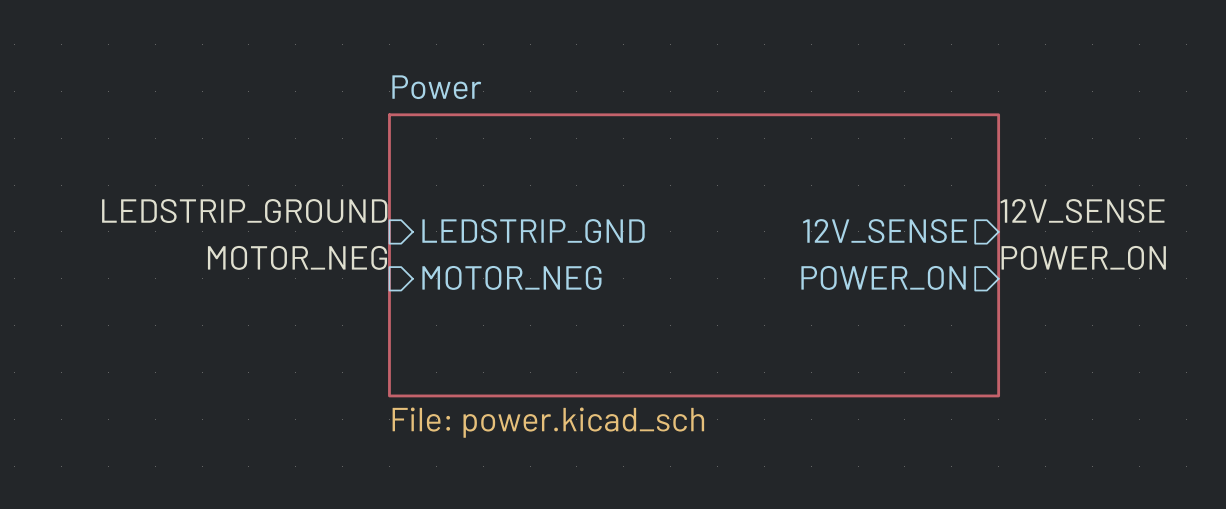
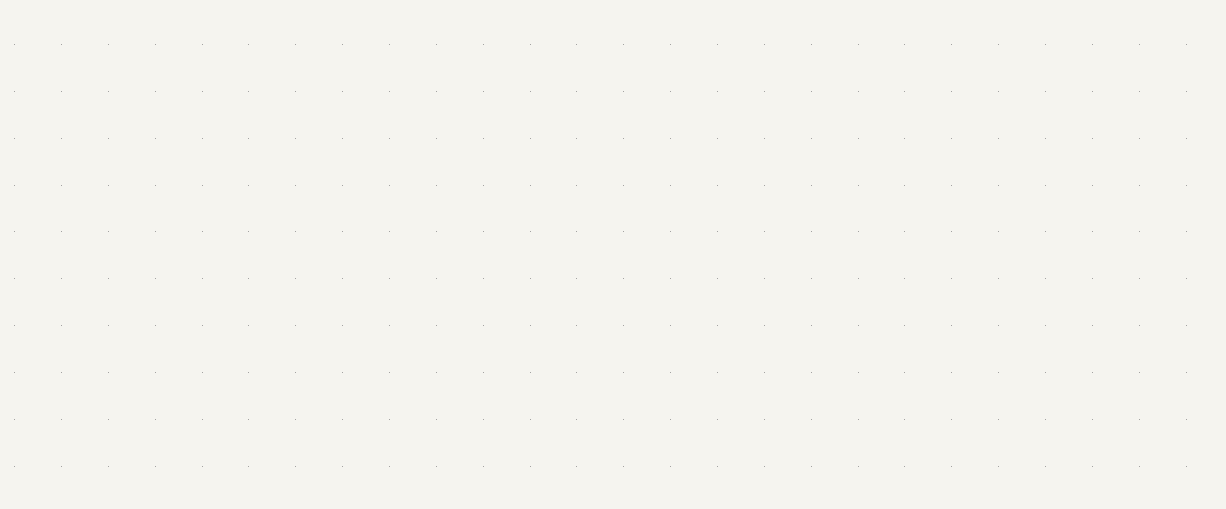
label: LEDSTRIP_GROUND (244, 211) -> none
label: 12V_SENSE (1082, 211) -> none
sheet pin: LEDSTRIP_GND (533, 231) -> none
sheet pin: 12V_SENSE (884, 231) -> none
sheet Power: File: power.kicad_sch (694, 255) -> none
label: MOTOR_NEG (297, 257) -> none
label: POWER_ON (1083, 257) -> none
sheet pin: MOTOR_NEG (511, 277) -> none
sheet pin: POWER_ON (883, 277) -> none

